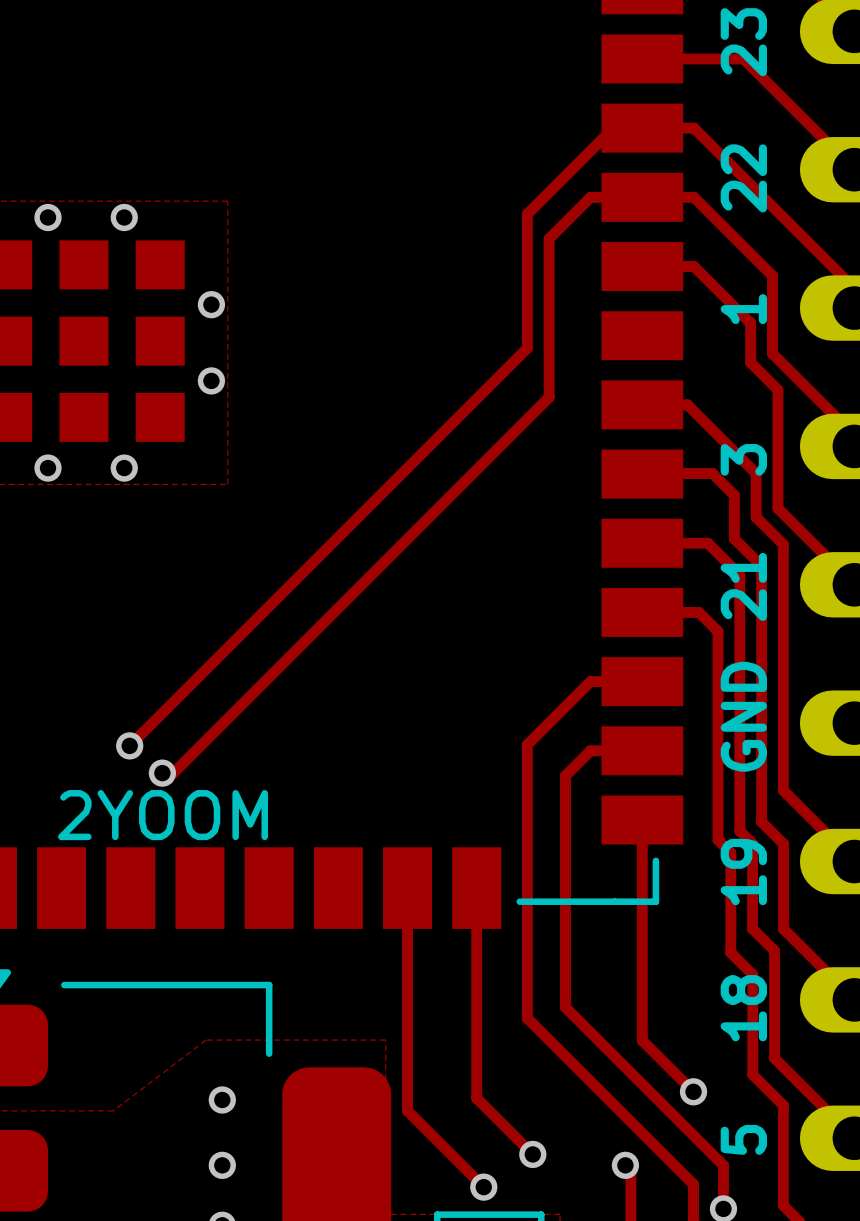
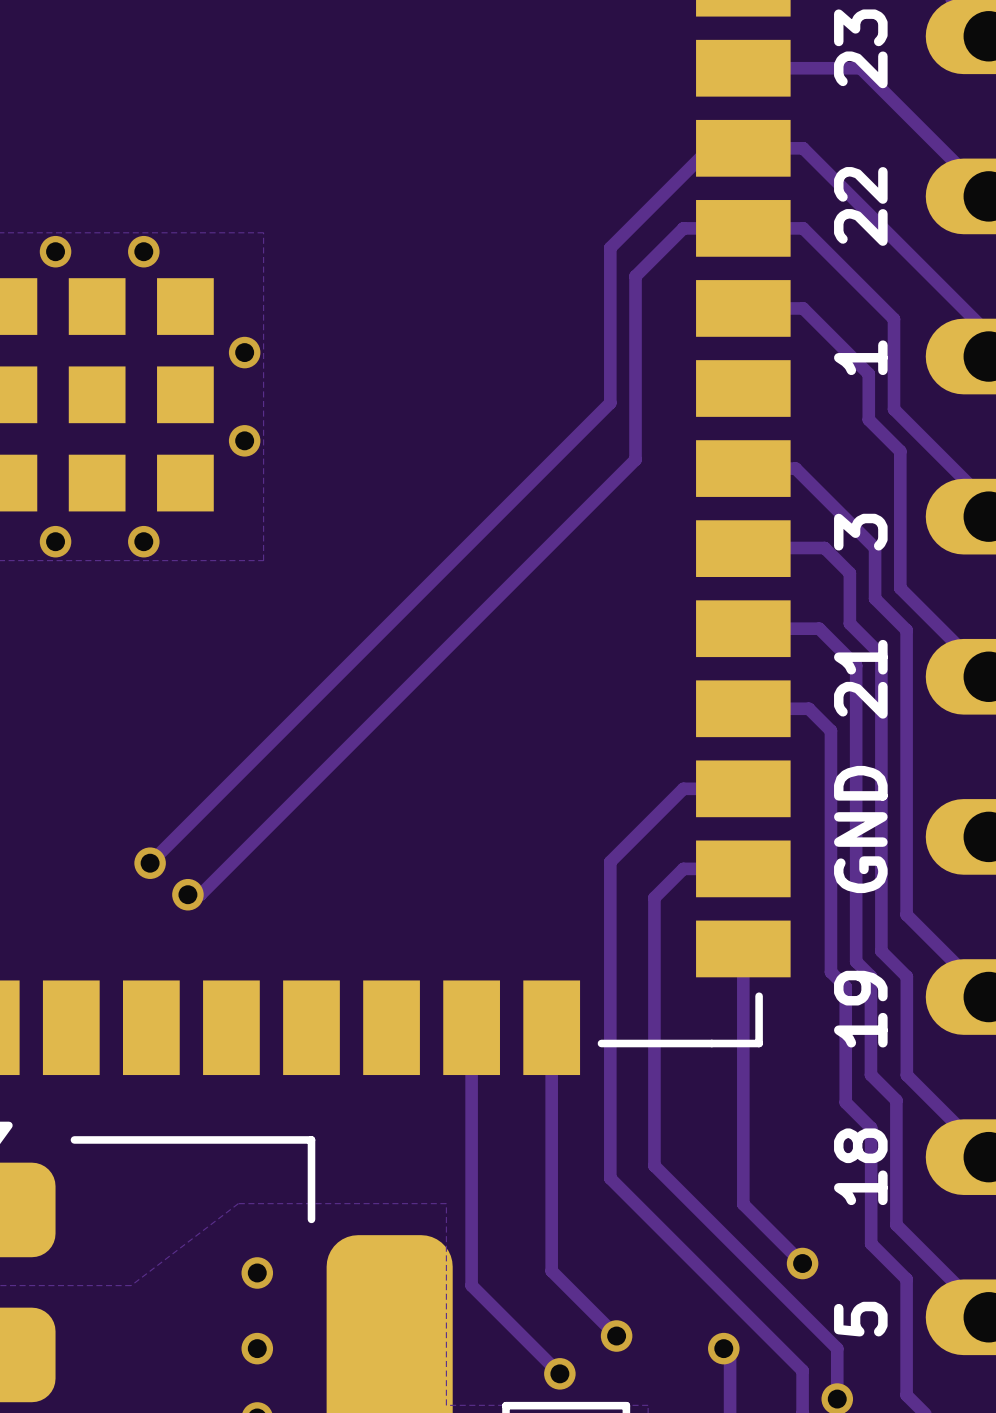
part text: 2YOOM (163, 815) -> none

